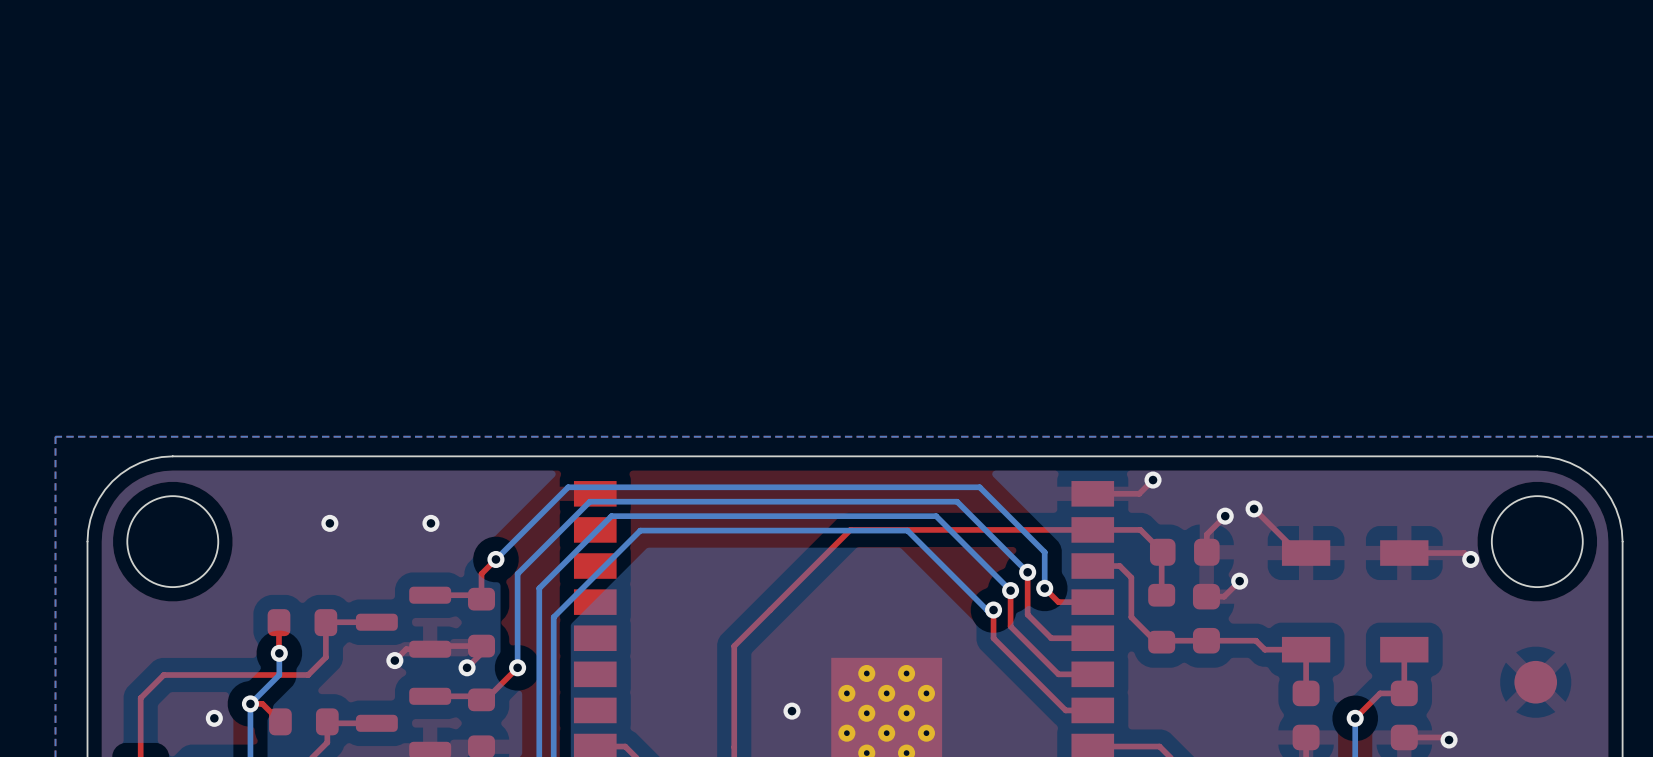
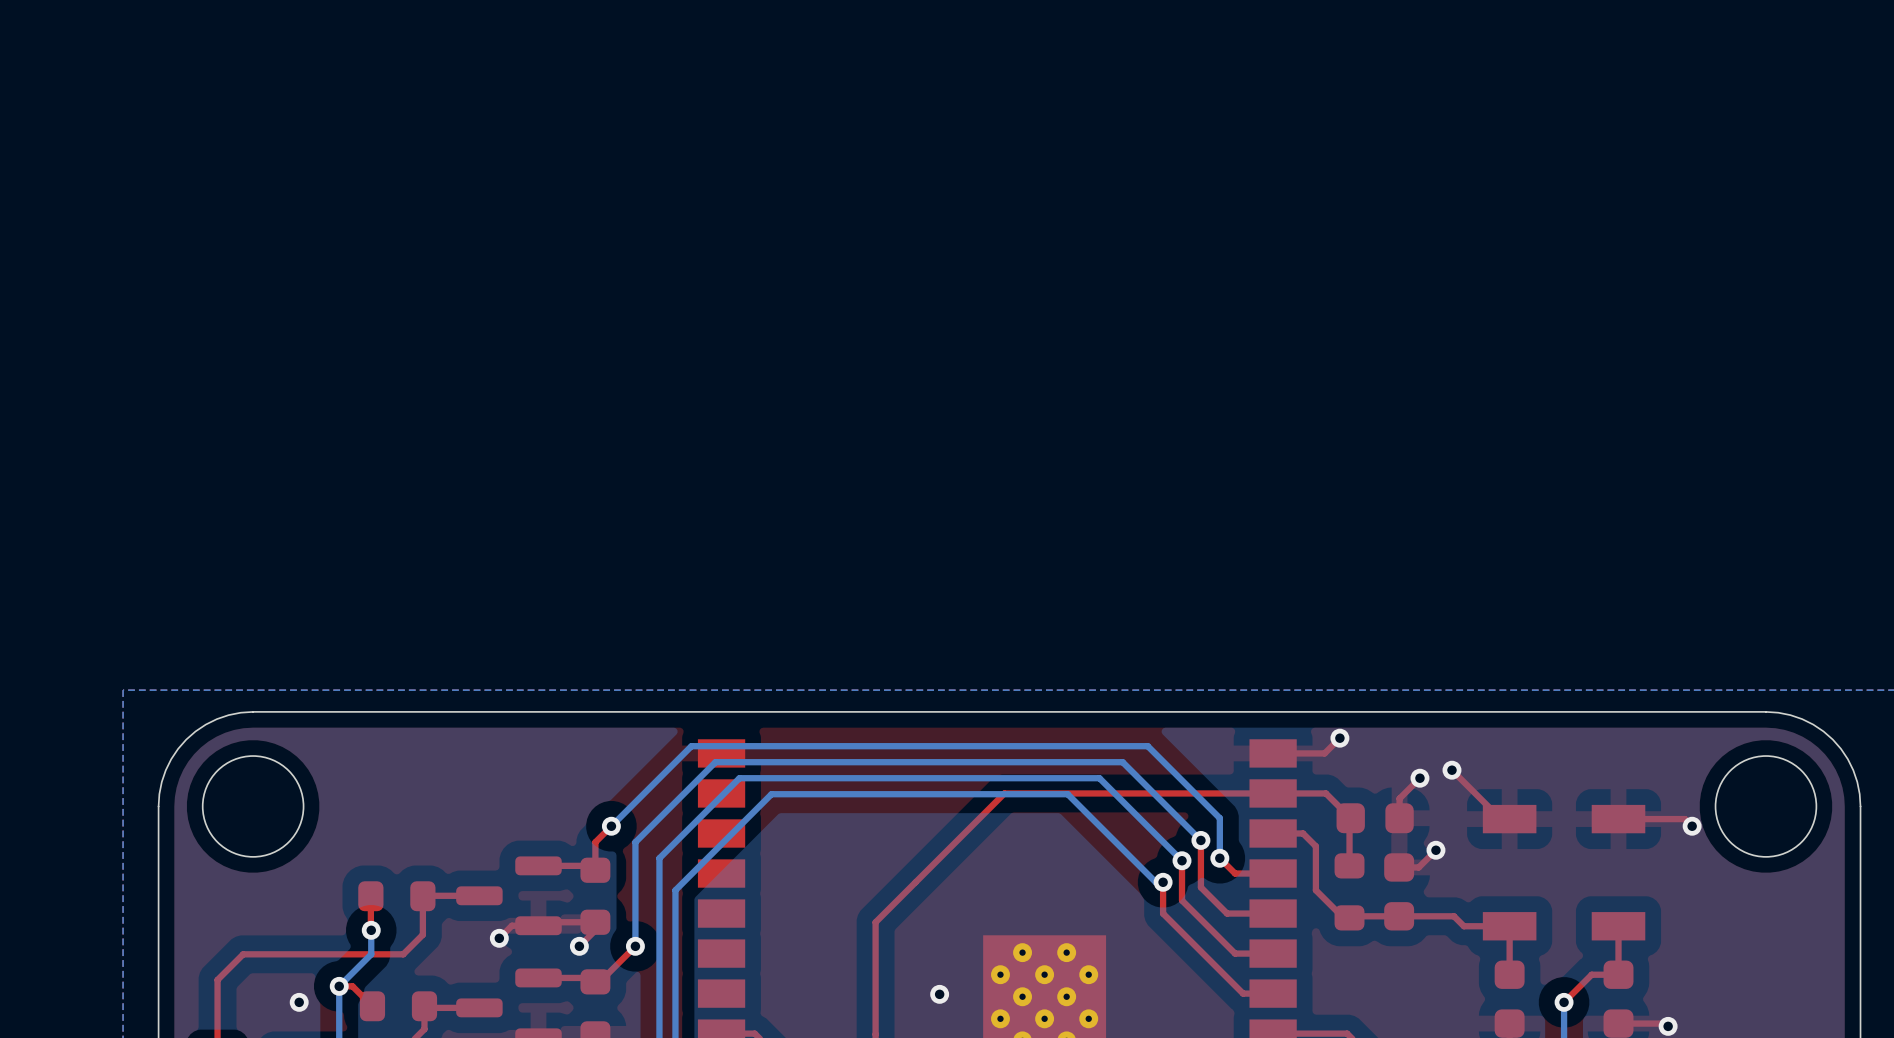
via: (329, 523) -> none
via: (430, 523) -> none
part: (1535, 682) -> none

